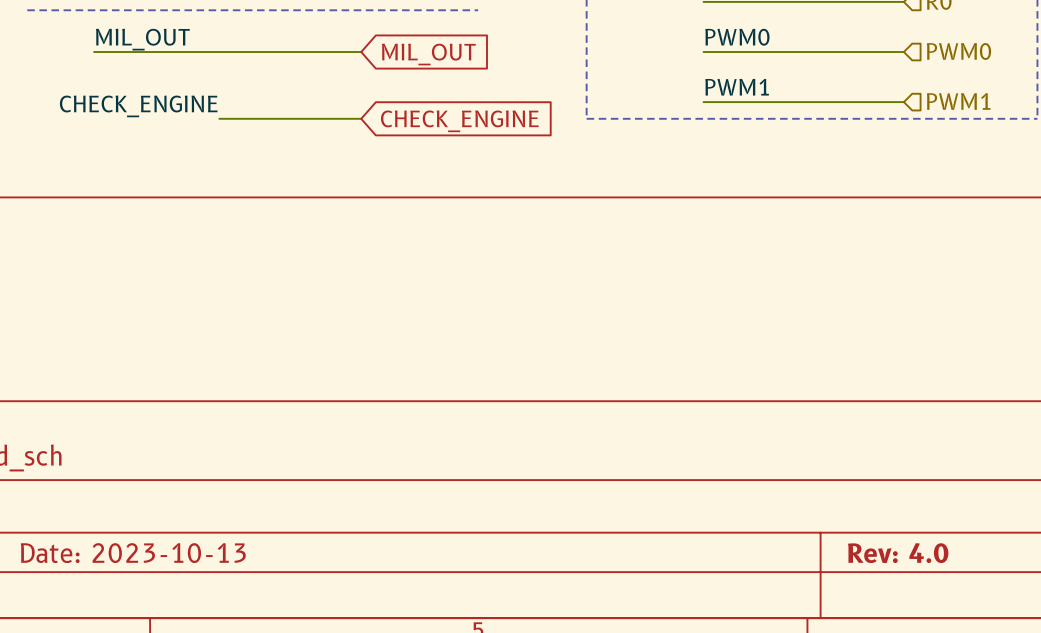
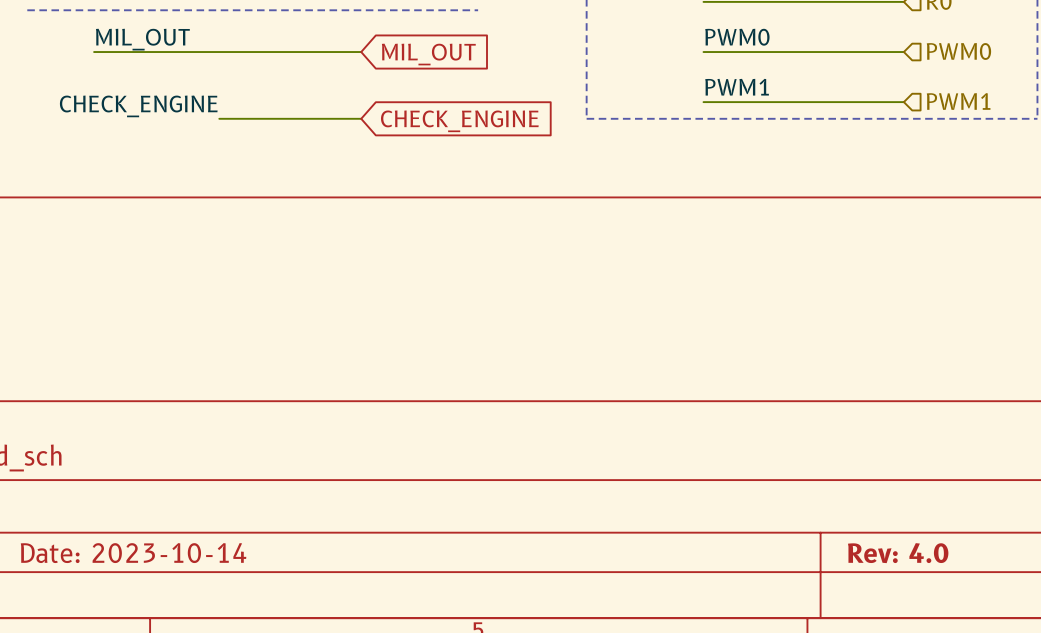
title block: Date: 2023-10-13 (133, 553) -> Date: 2023-10-14 (133, 553)

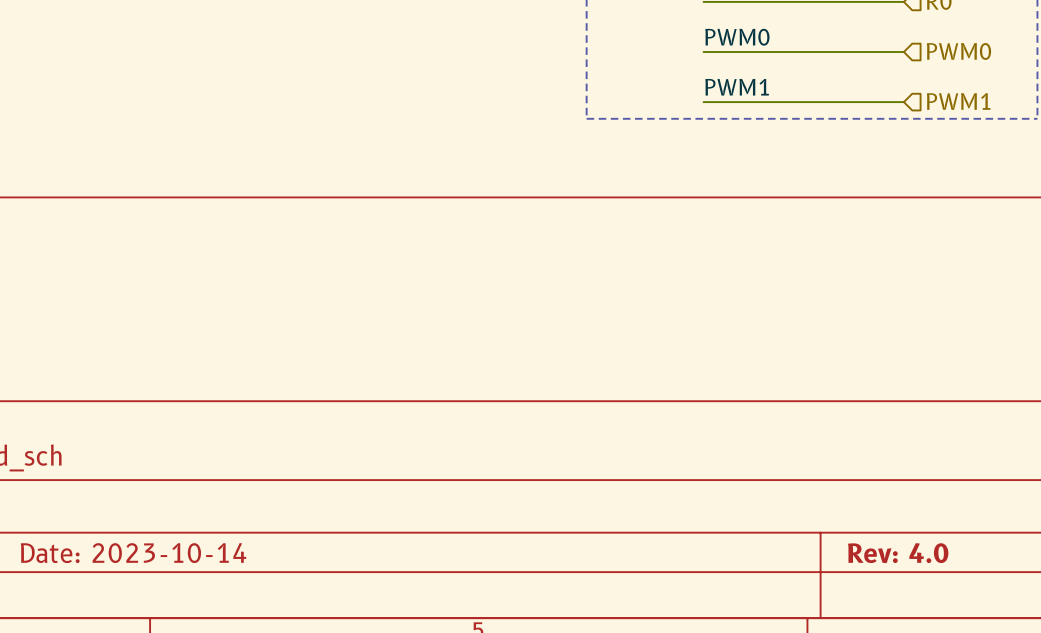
line: (27, 10) (478, 10) -> none
label: MIL_OUT (142, 39) -> none
wire: (94, 52) (361, 52) -> none
global label: MIL_OUT (428, 54) -> none
label: CHECK_ENGINE (138, 106) -> none
wire: (219, 118) (361, 118) -> none
global label: CHECK_ENGINE (459, 121) -> none

